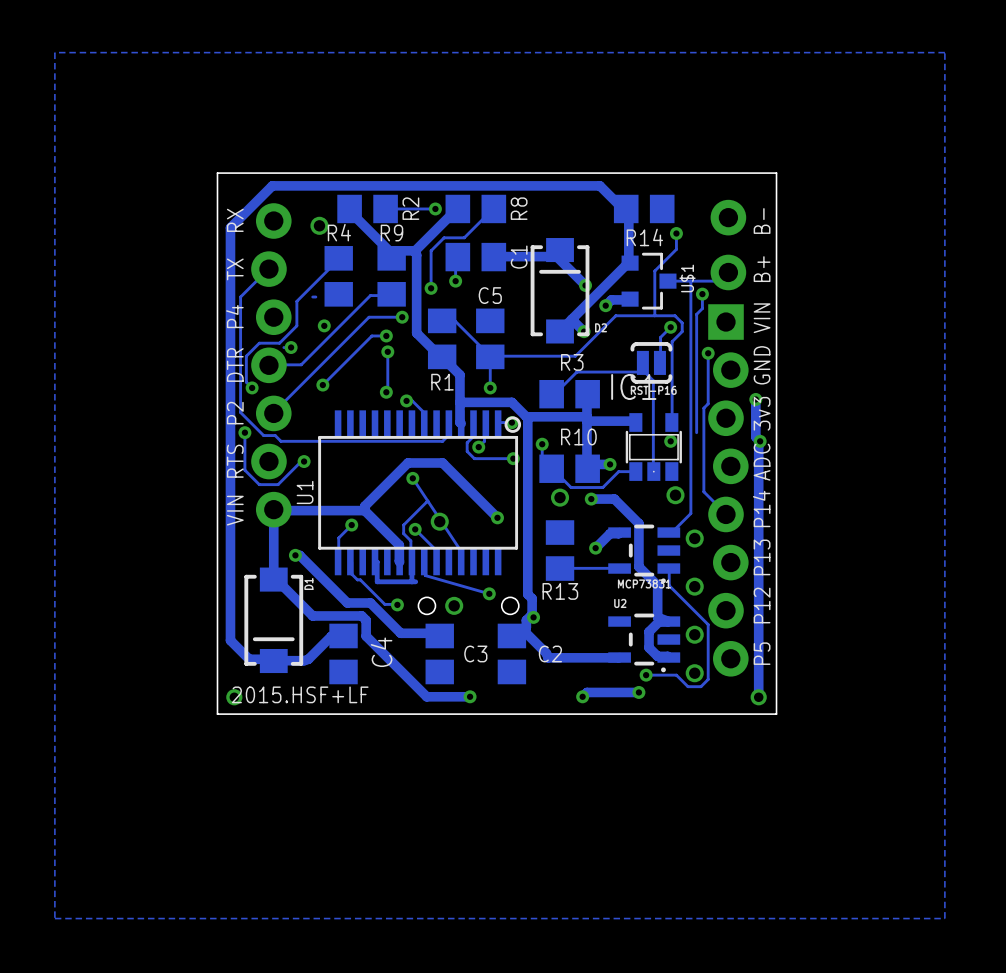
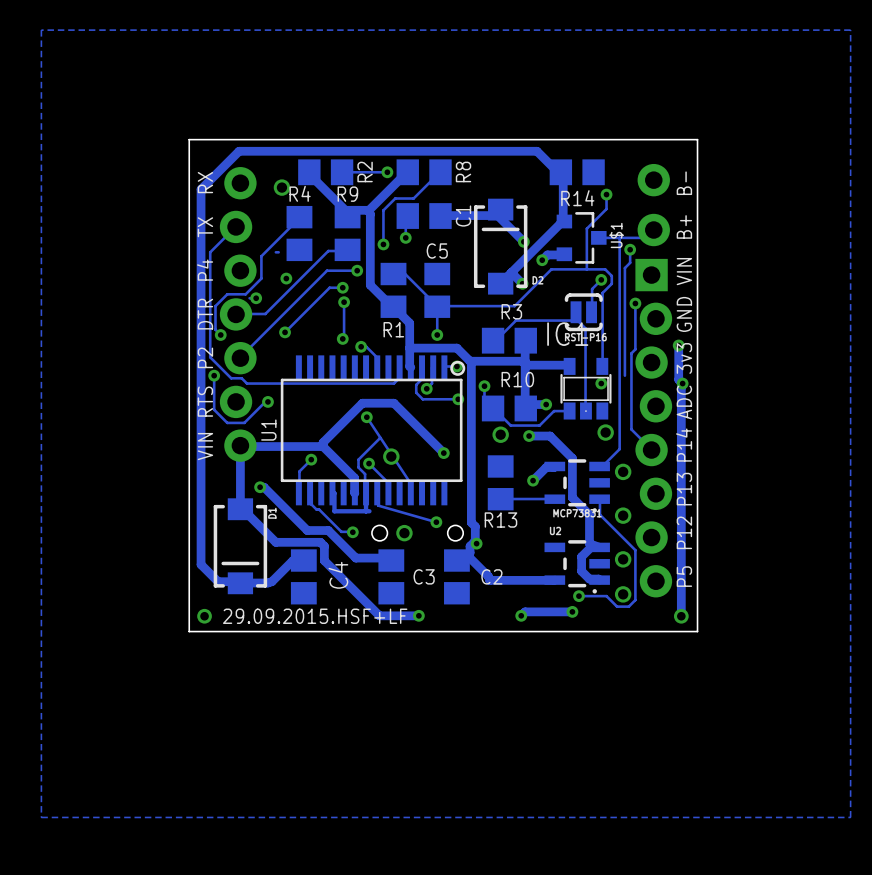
text: 2015.HSF+LF (300, 694) -> 29.09.2015.HSF+LF (315, 616)

